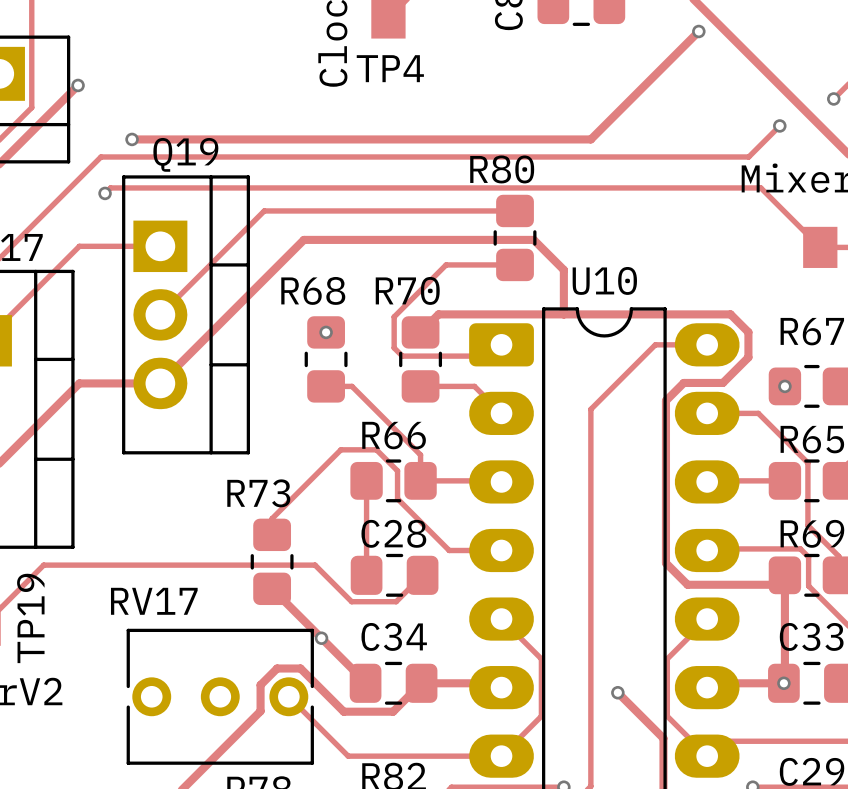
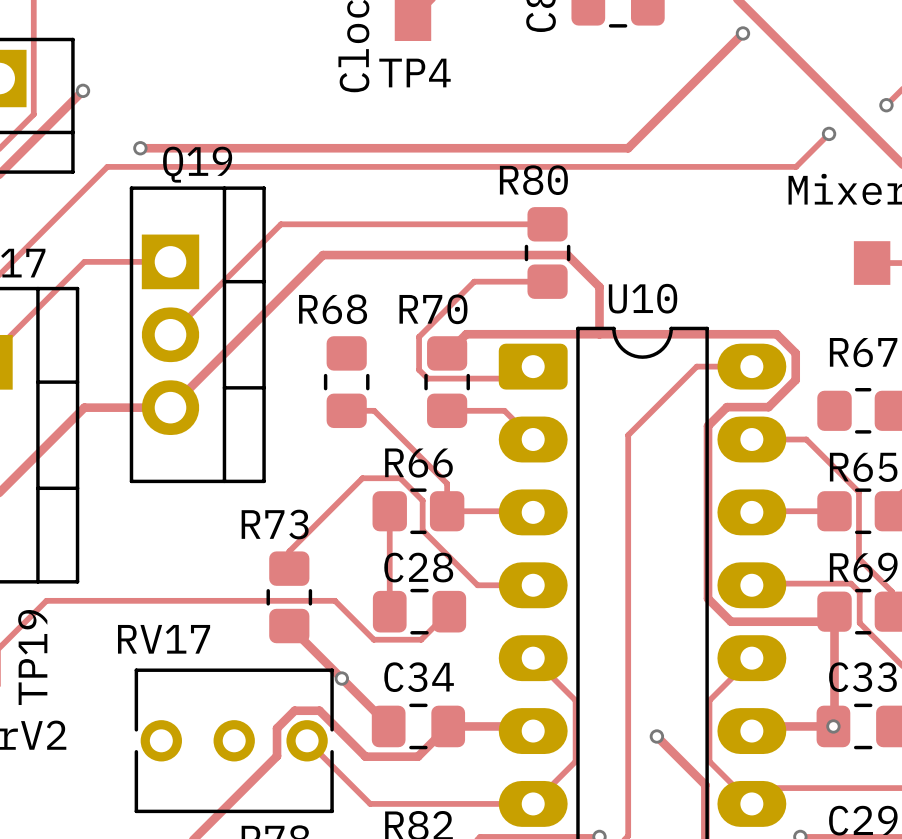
track: (105, 193) (110, 187) (760, 187) (820, 247) -> none
via: (105, 193) -> none
via: (326, 332) -> none
via: (784, 386) -> none

